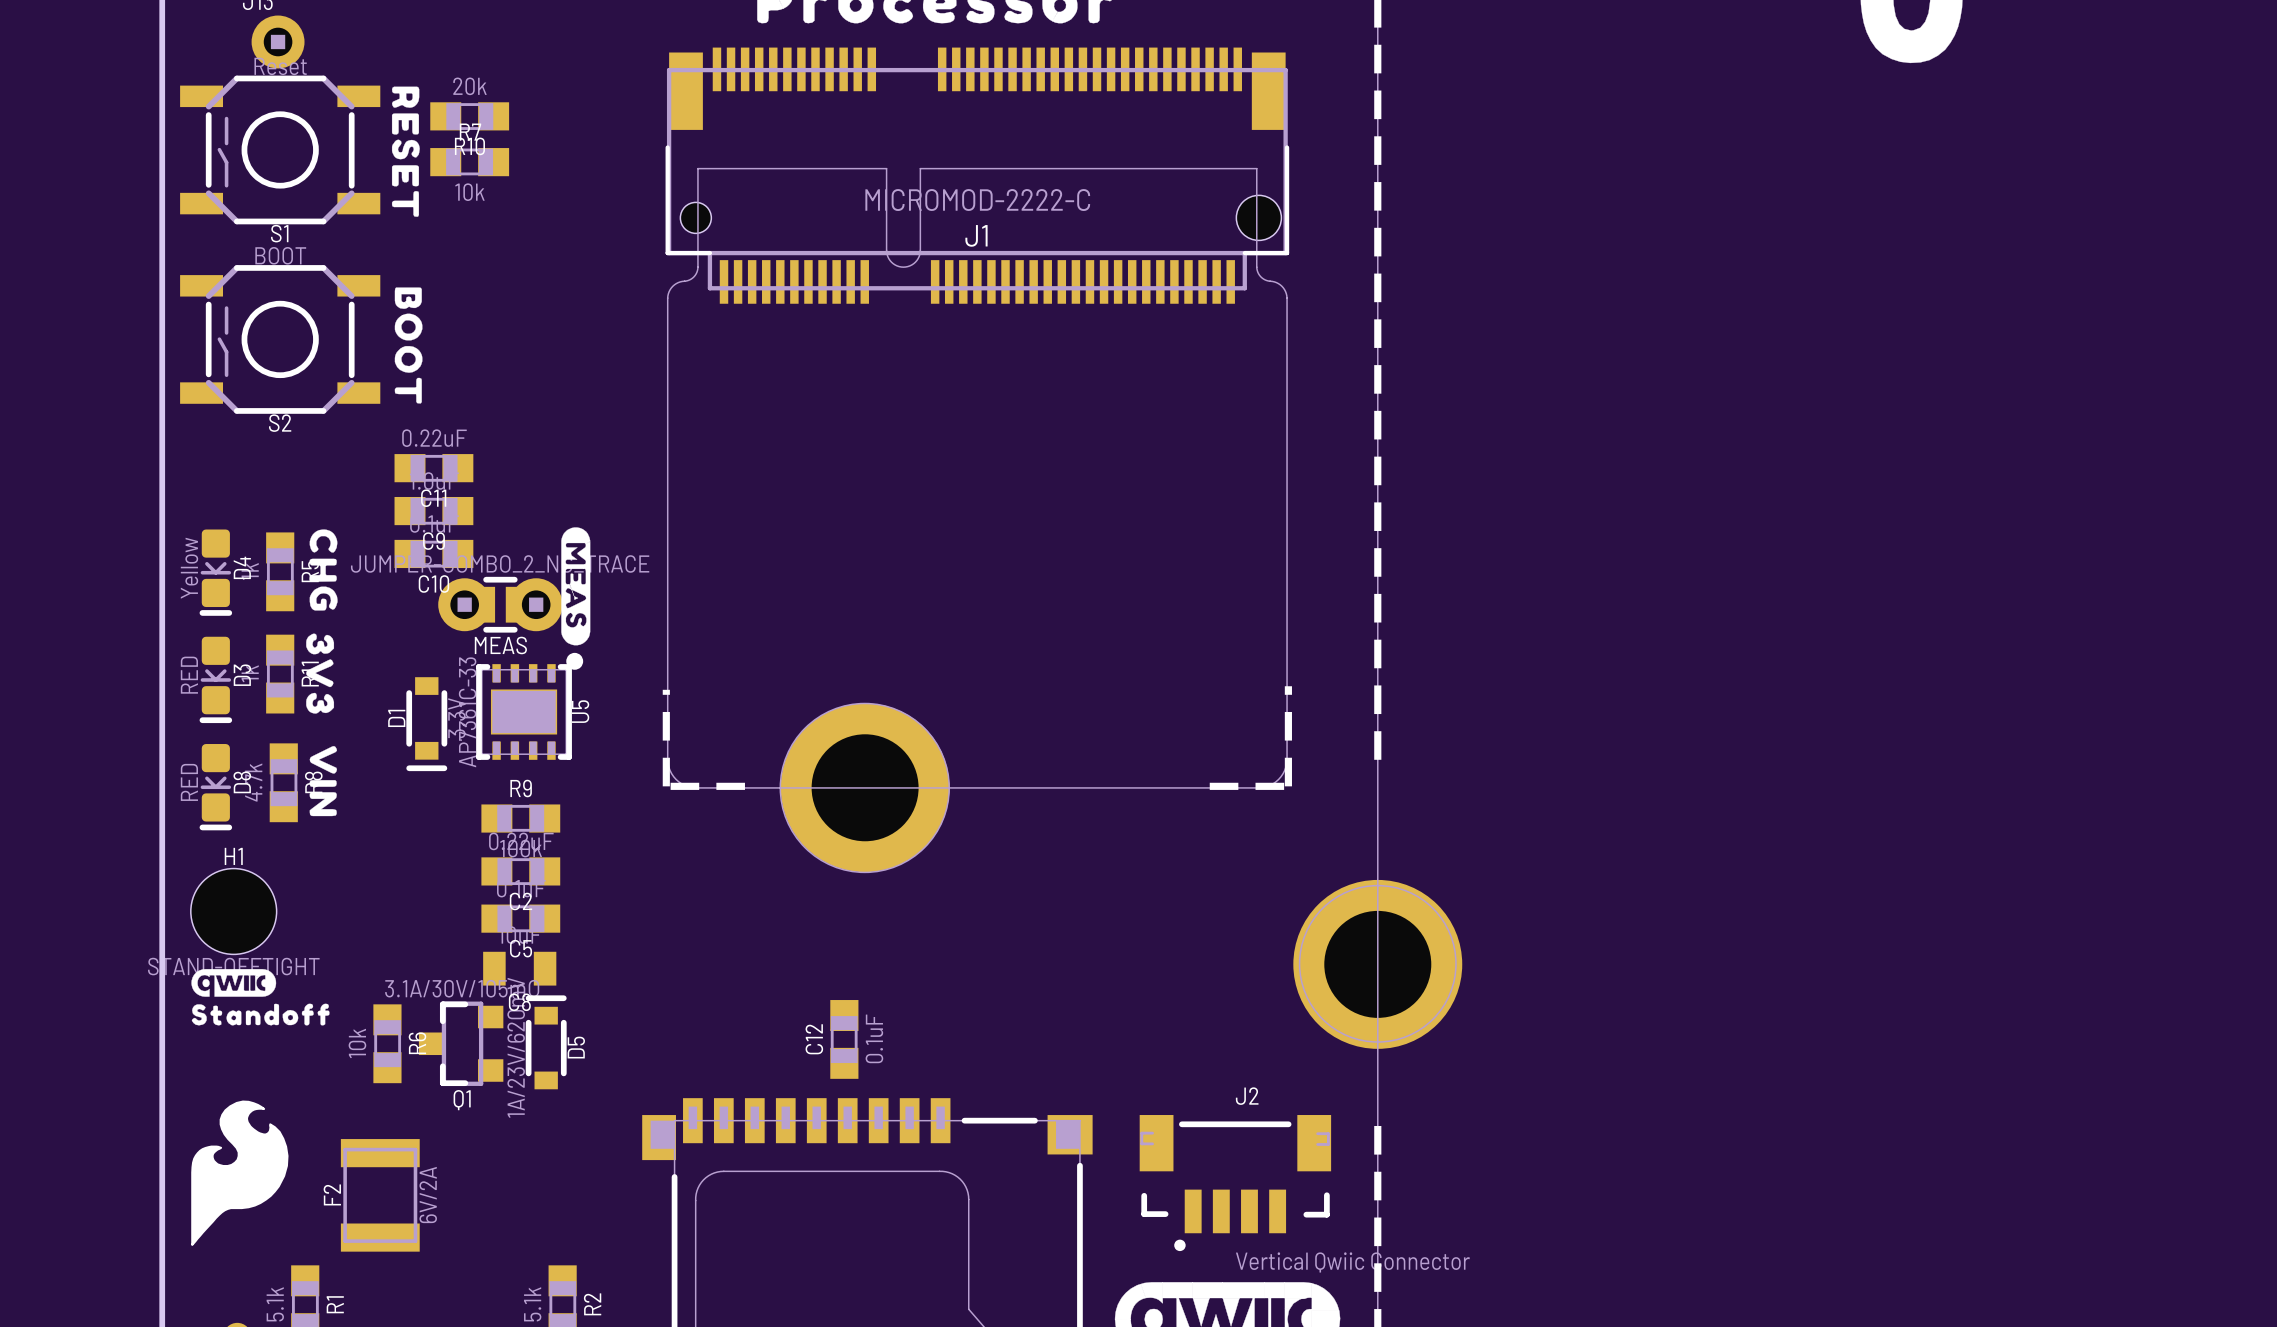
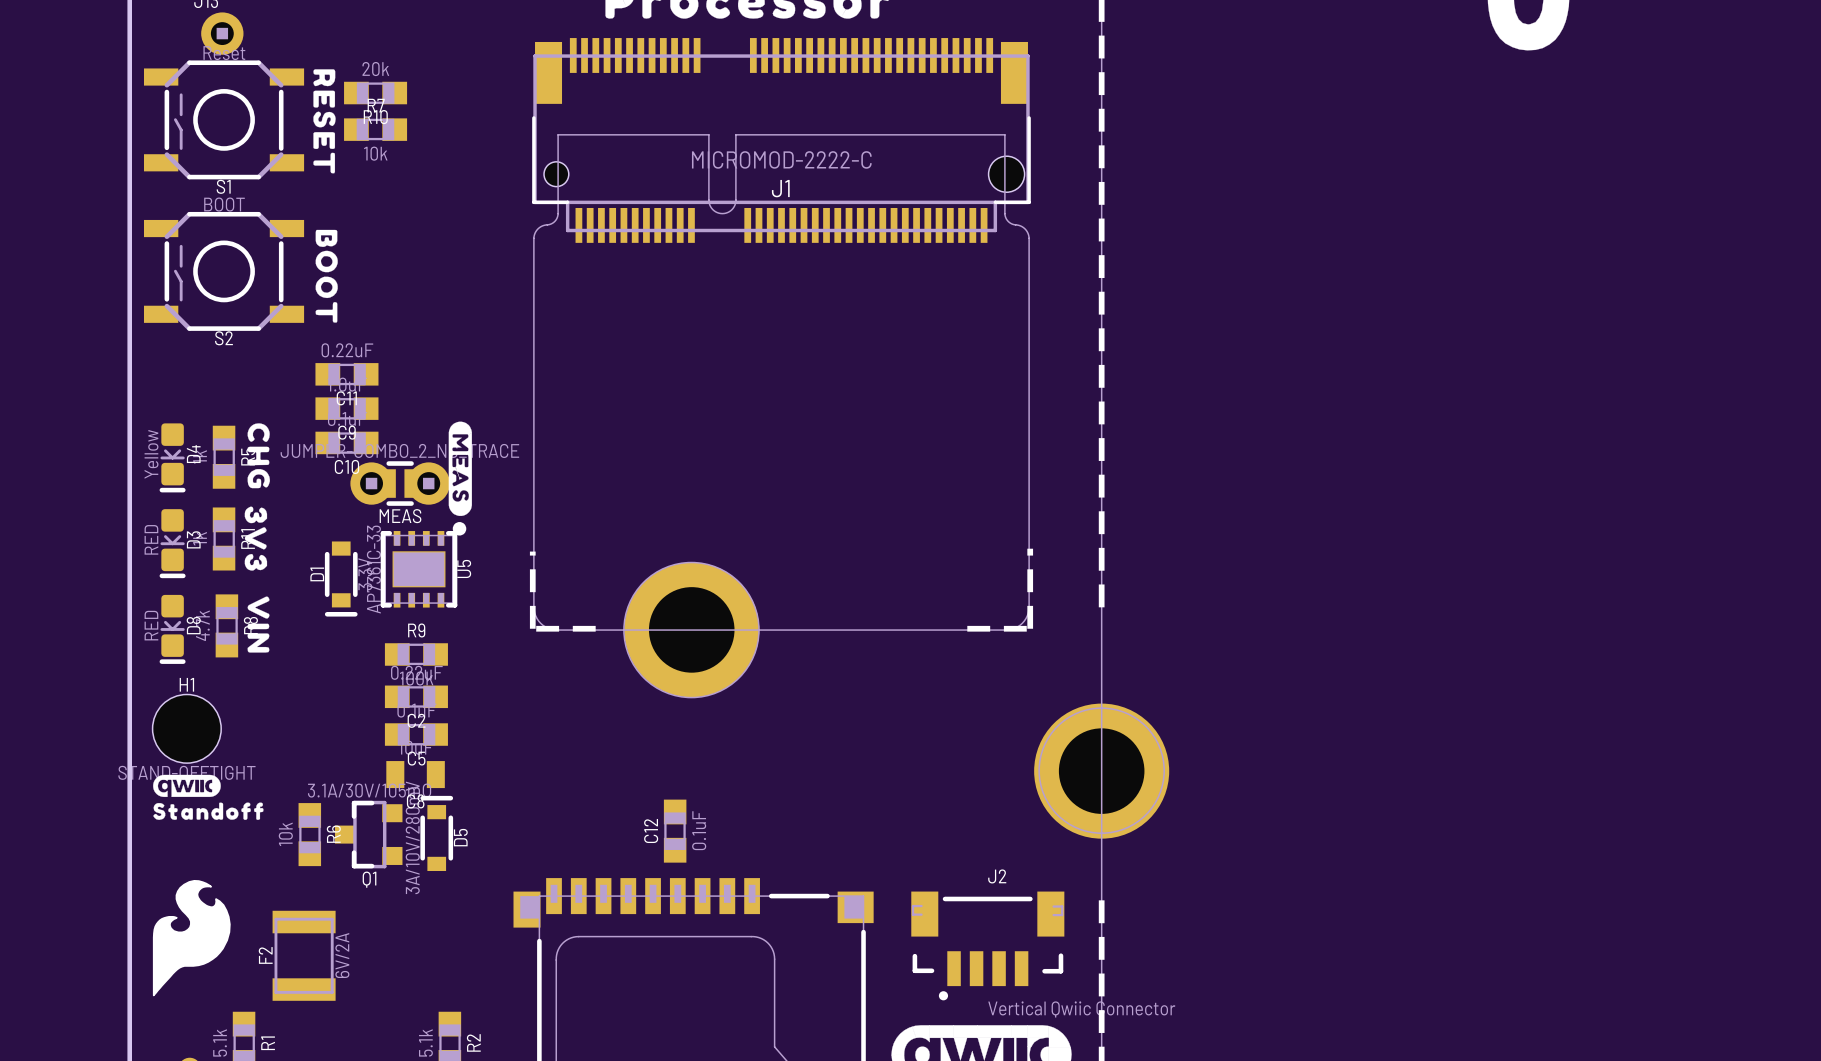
D5 value: 1A/23V/620mV (516, 1047) -> 3A/10V/280mV (412, 837)

